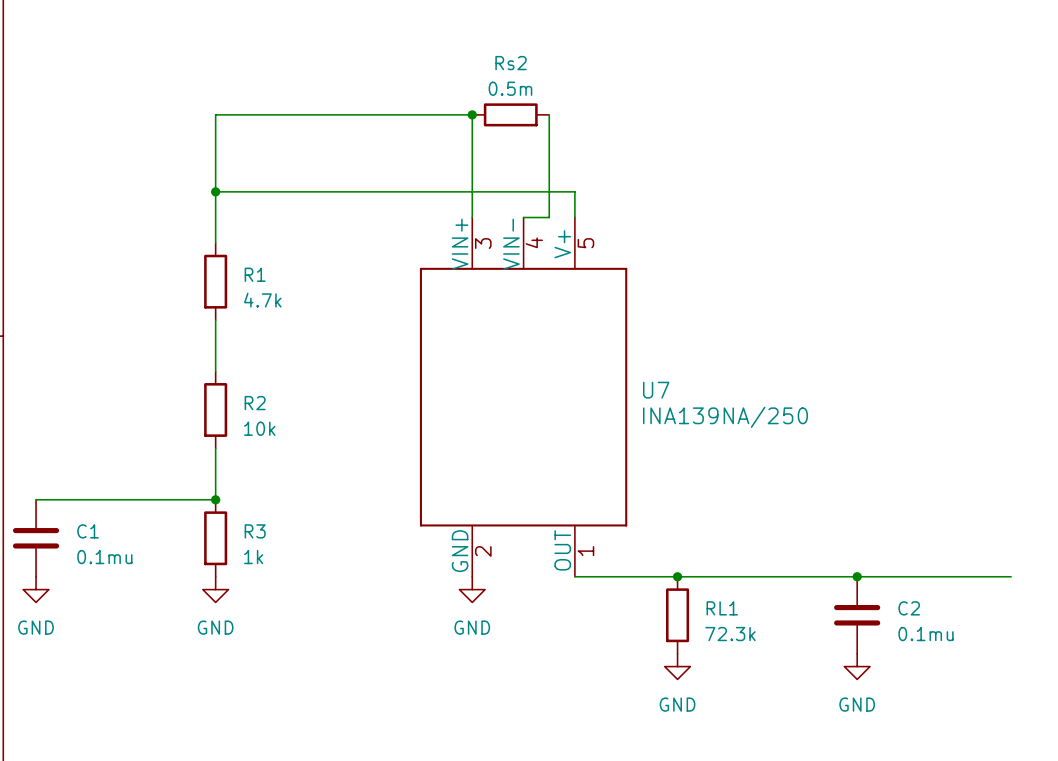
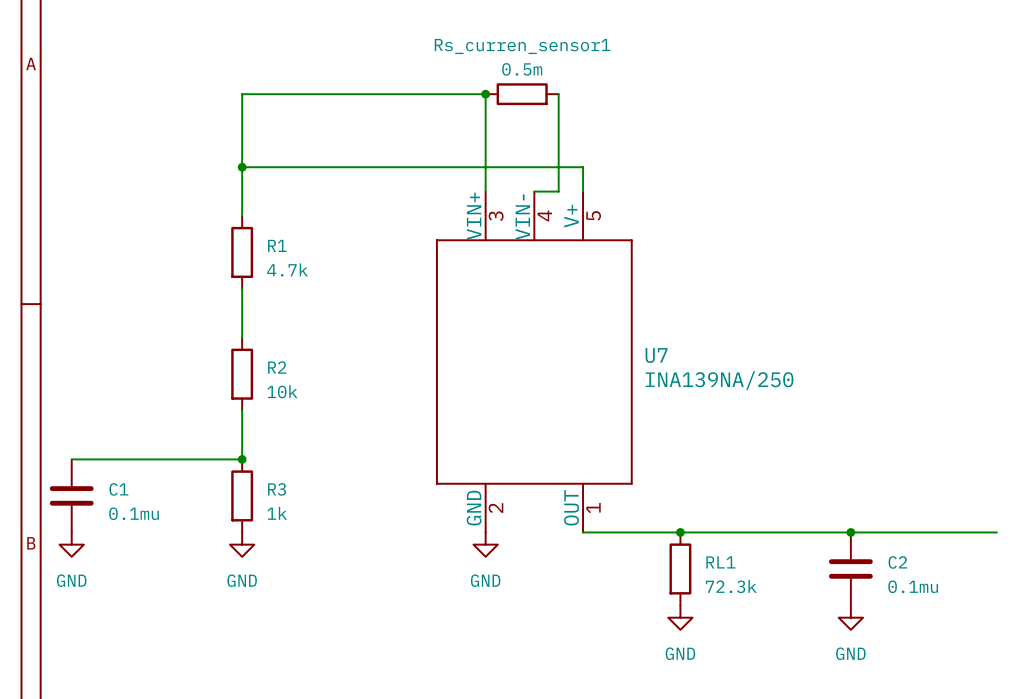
Rs2 name: Rs2 (511, 63) -> Rs_curren_sensor1 (522, 46)

